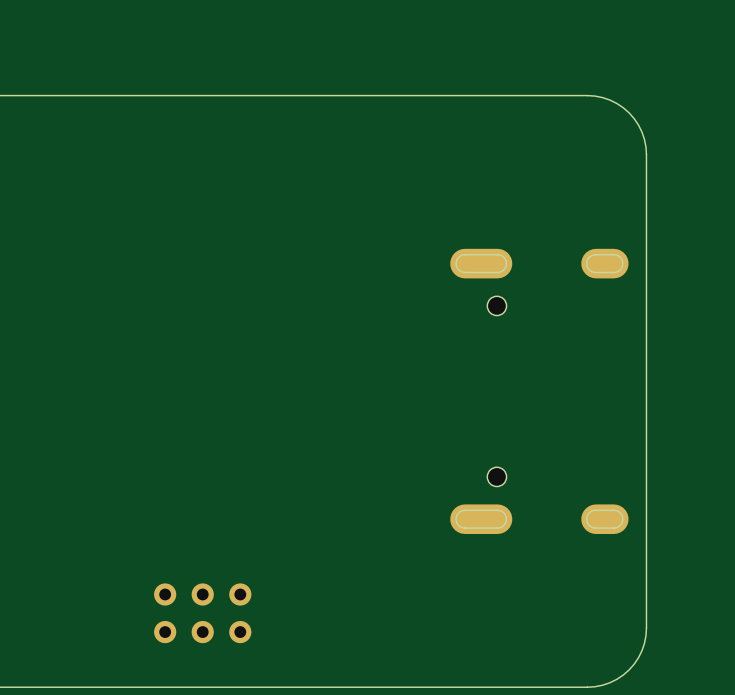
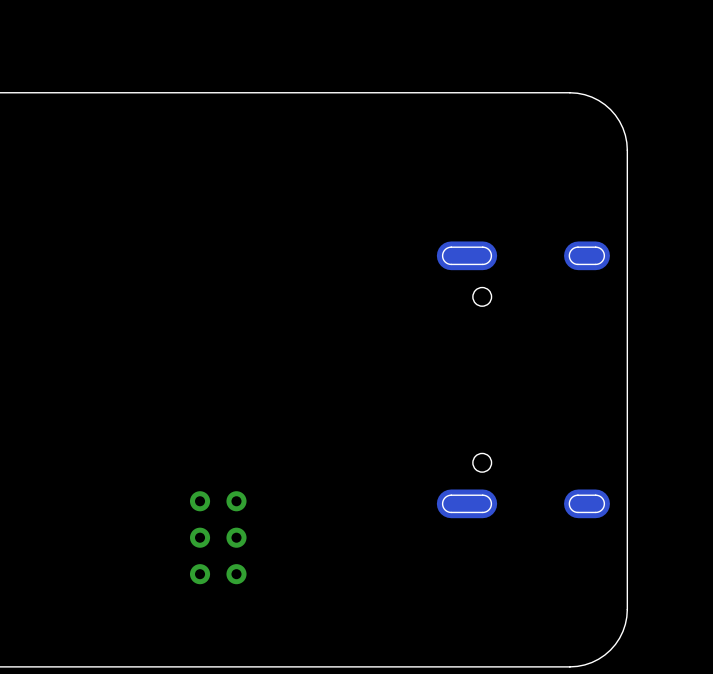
part: none -> (218, 537)
part: (202, 613) -> none

